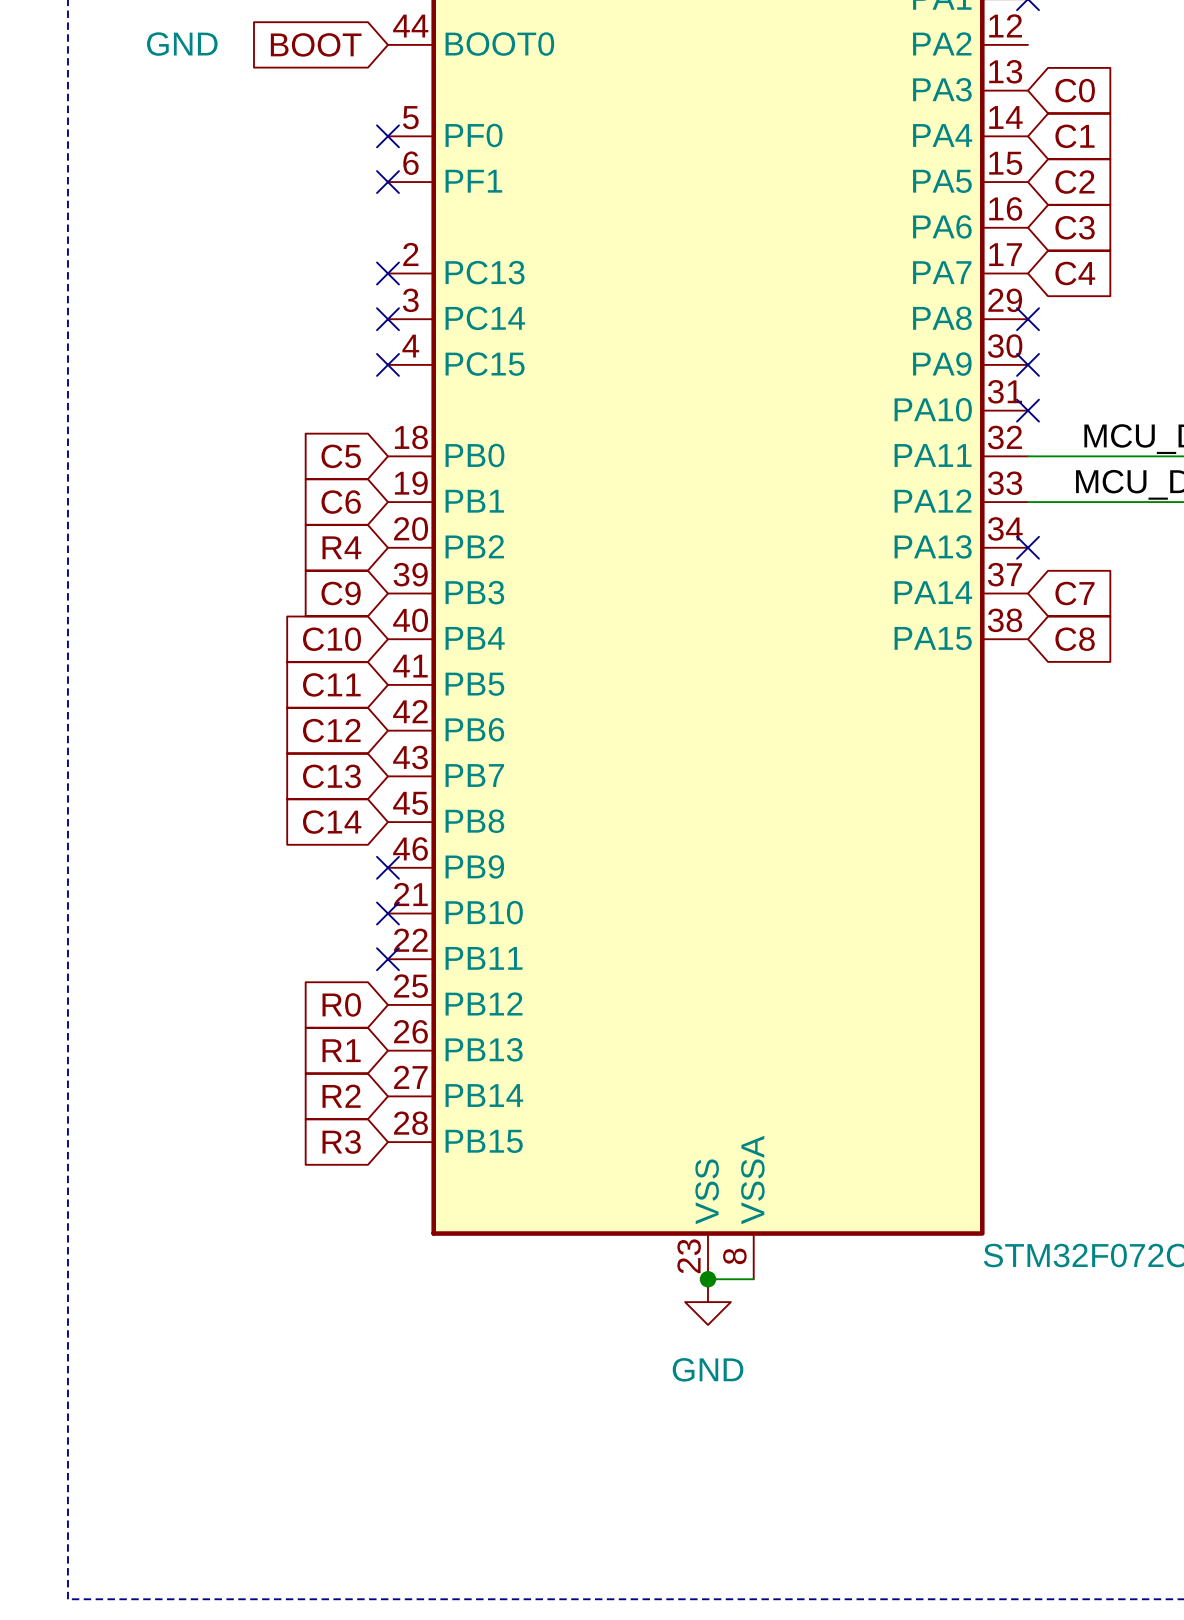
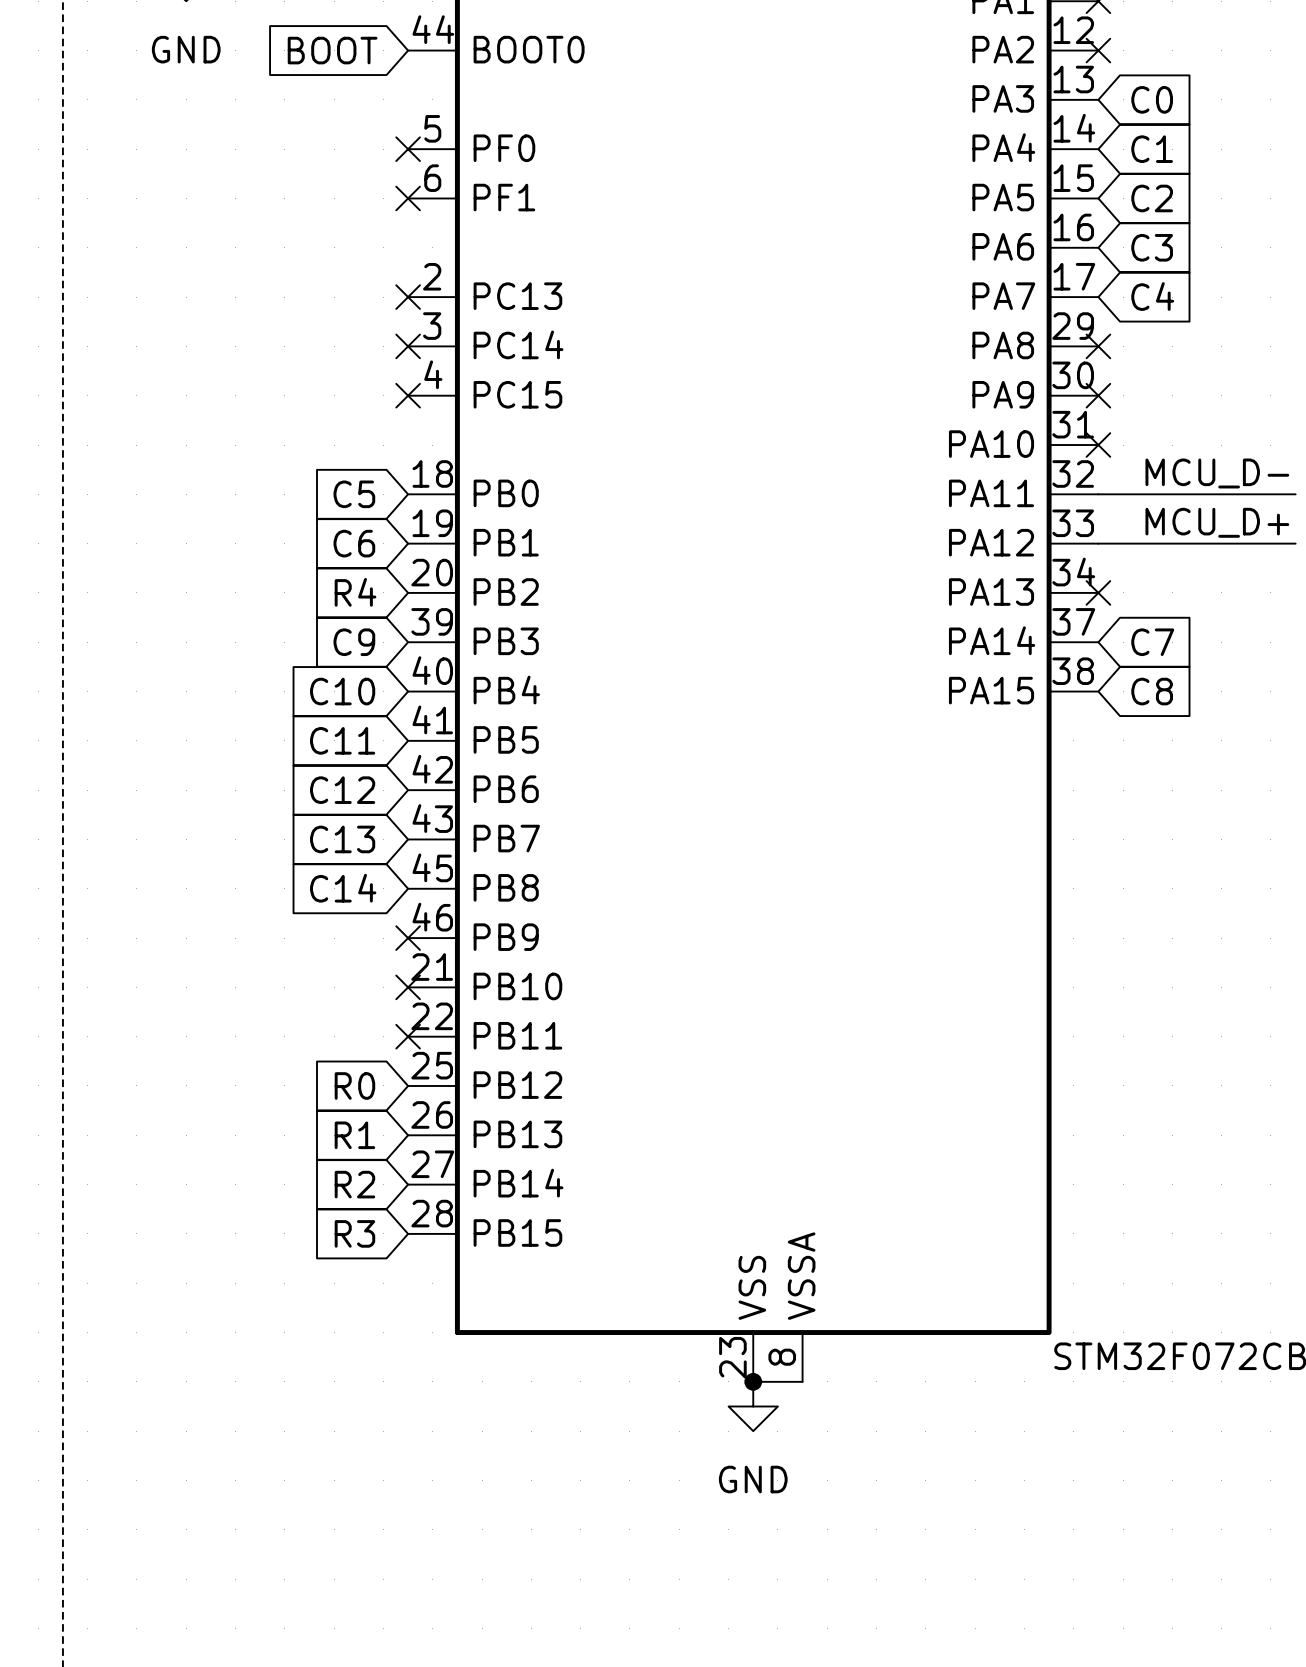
no-connect mark: none -> (1098, 50)

